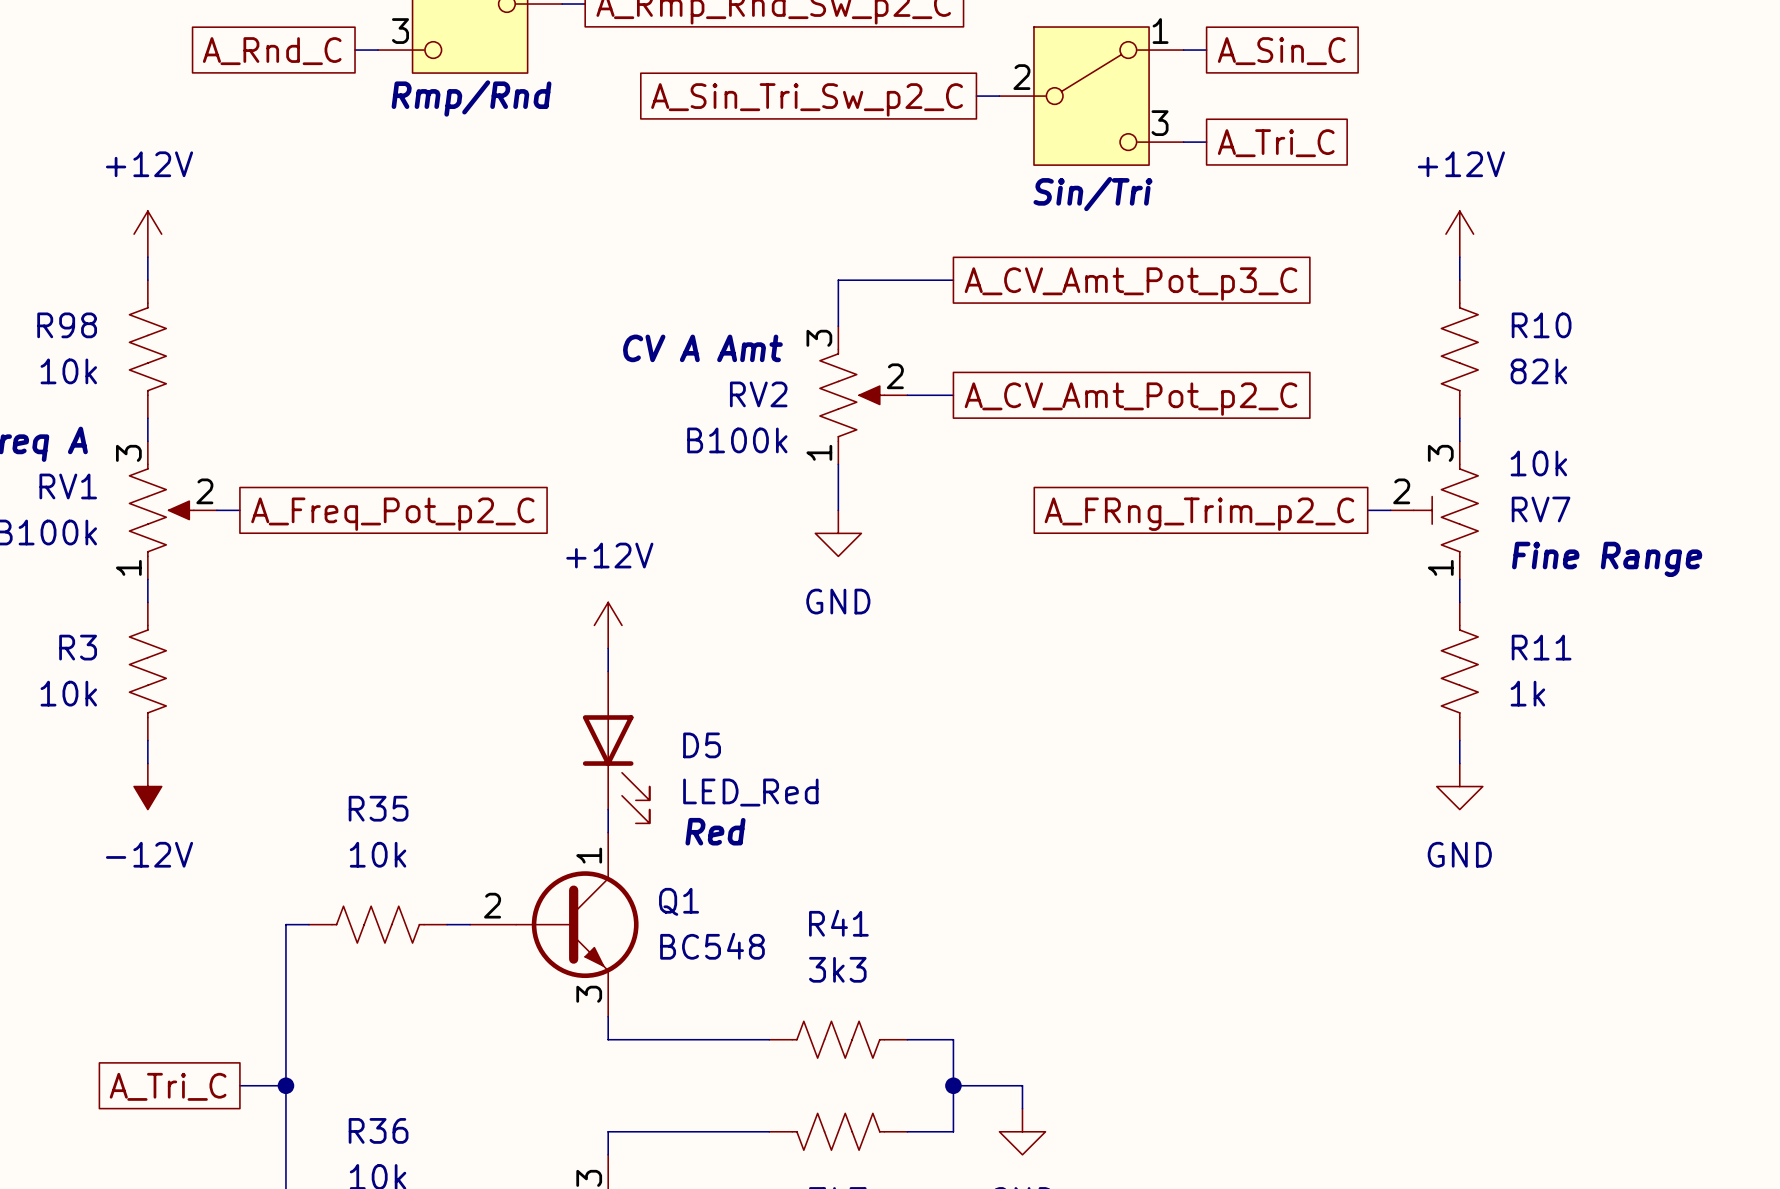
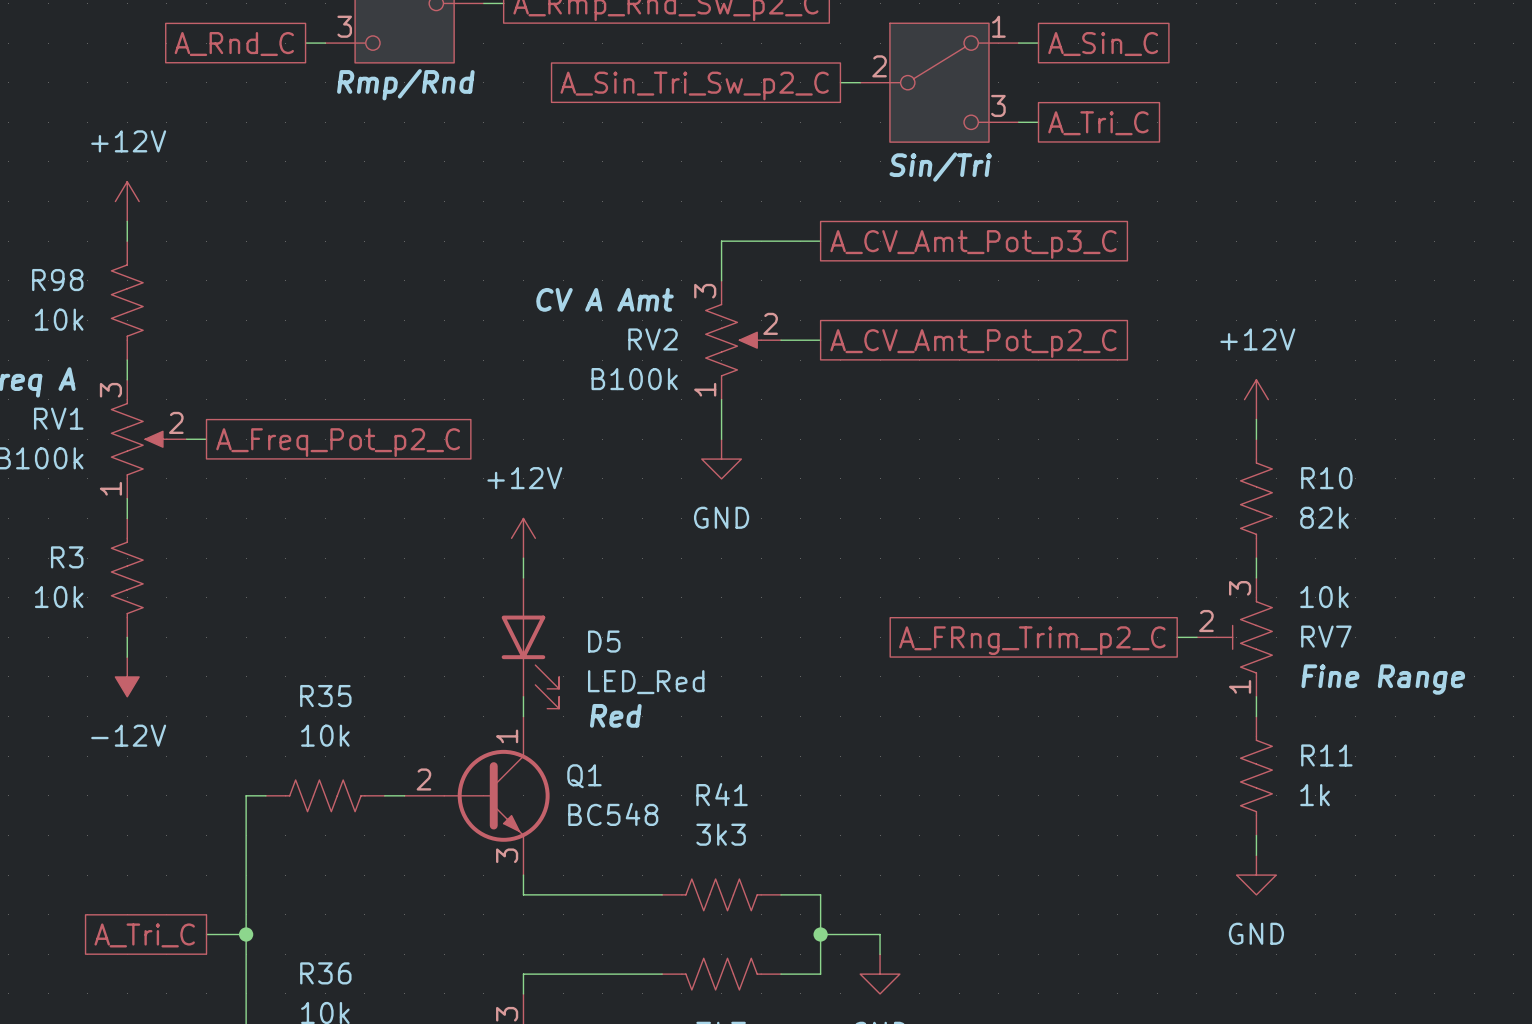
power symbol position: +12V (1459, 234) -> +12V (1256, 399)
wire: (1459, 257) (1459, 280) -> (1256, 419) (1256, 439)
R10 position: (1459, 349) -> (1256, 498)
wire: (1459, 418) (1459, 441) -> (1256, 558) (1256, 577)
wire: (1367, 510) (1390, 510) -> (1177, 637) (1196, 637)
RV7 position: (1434, 510) -> (1234, 637)
global label position: A_FRng_Trim_p2_C (1199, 514) -> A_FRng_Trim_p2_C (1032, 640)
wire: (1459, 579) (1459, 602) -> (1256, 696) (1256, 716)
R11 position: (1459, 671) -> (1256, 776)
wire: (1459, 740) (1459, 763) -> (1256, 835) (1256, 855)
power symbol position: GND (1459, 786) -> GND (1256, 875)

